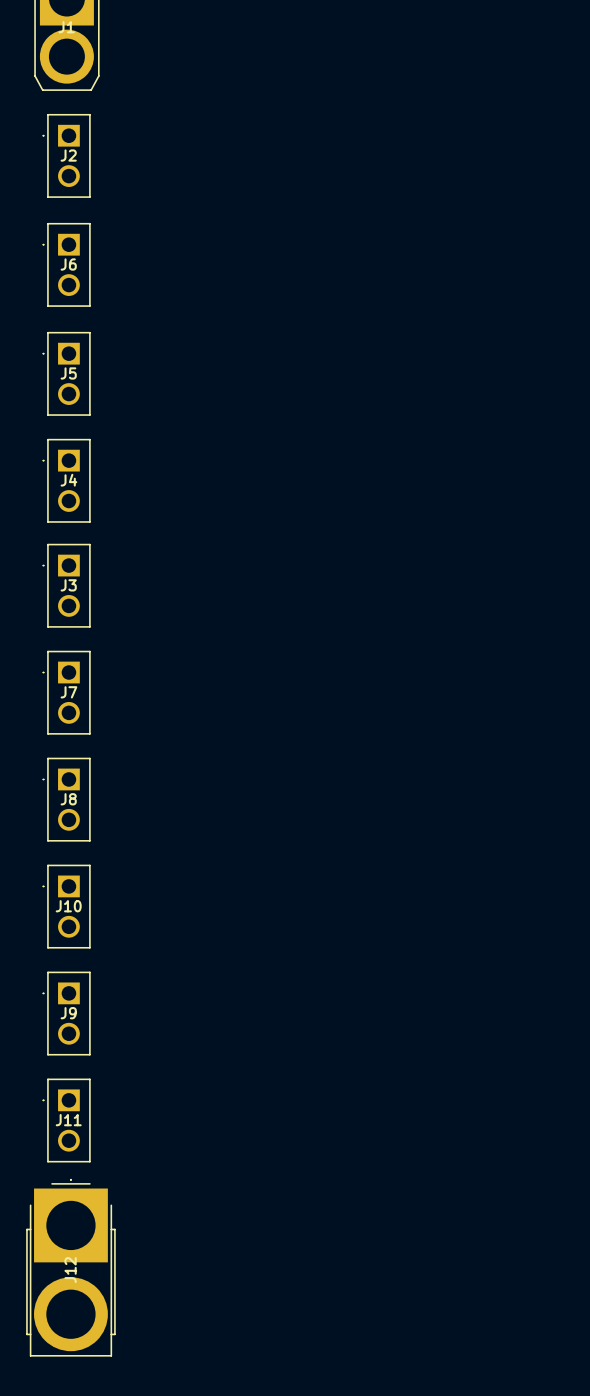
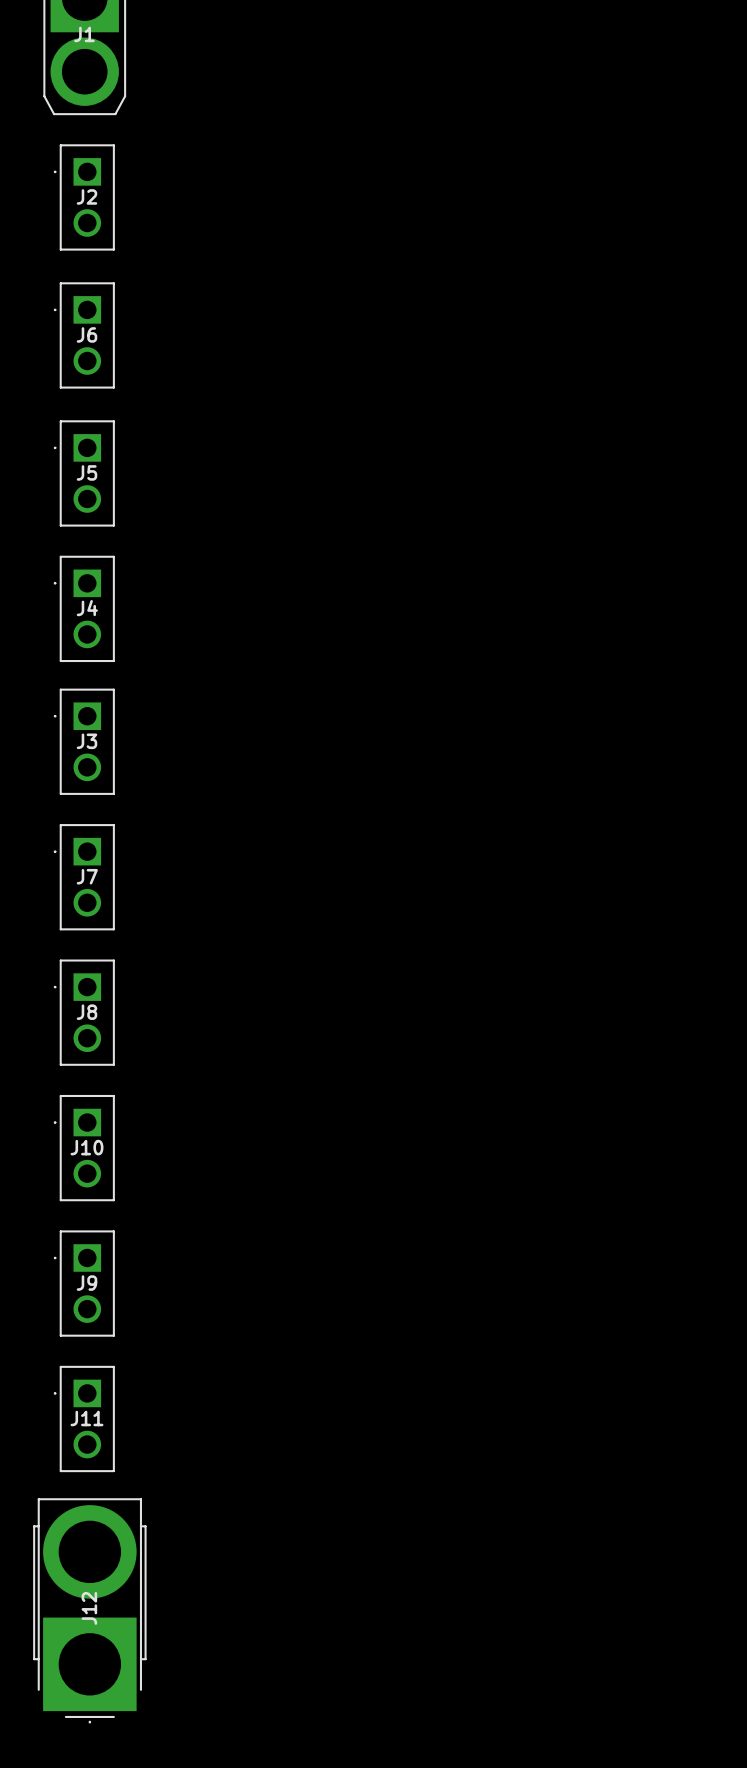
J12 rotation: 0° (70, 1267) -> 180° (89, 1610)

